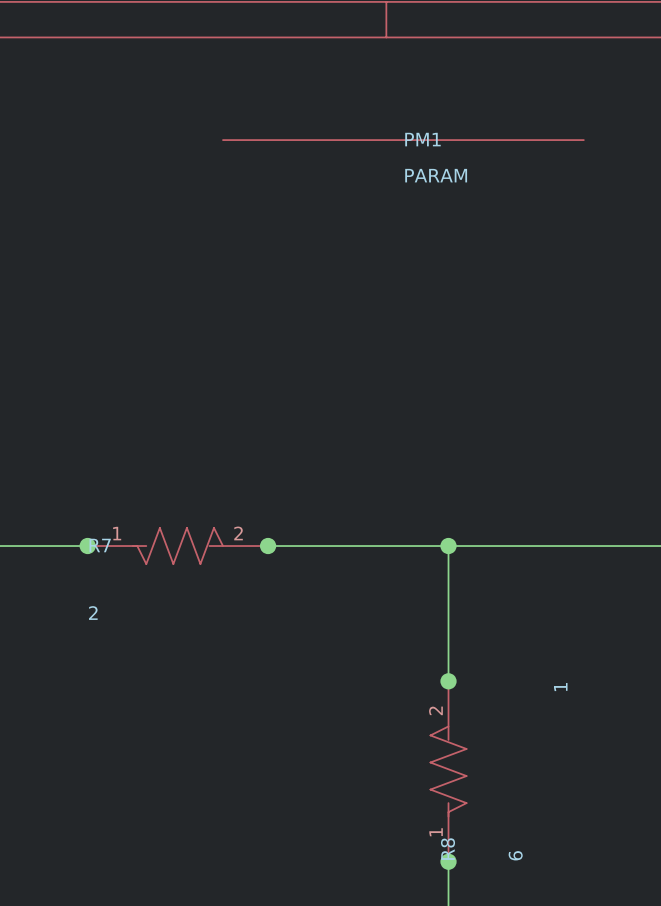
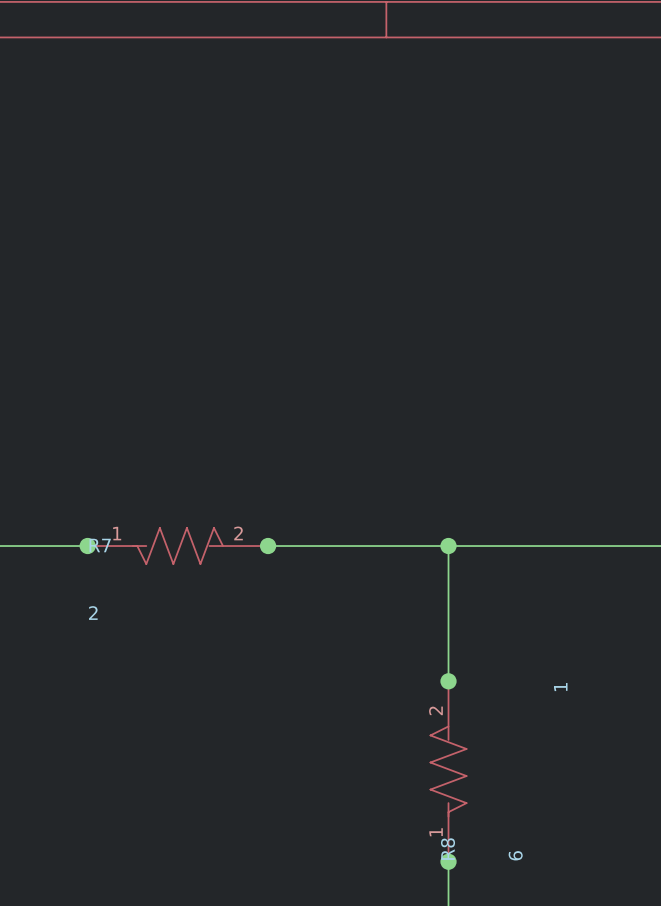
PM1: PARAM (403, 140) -> none

